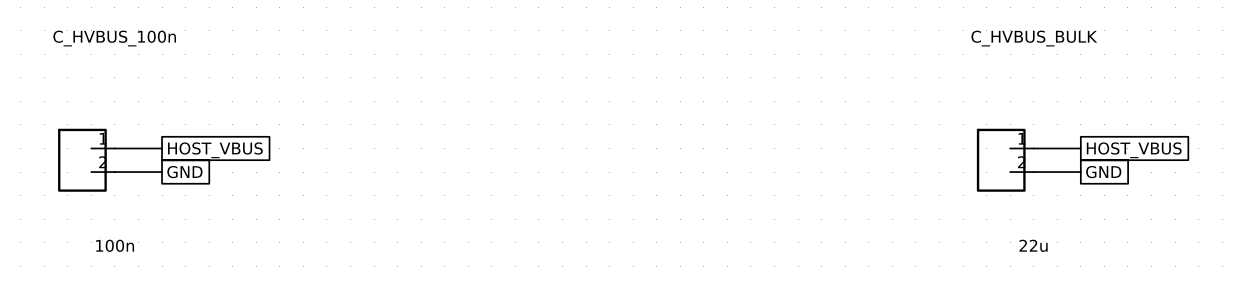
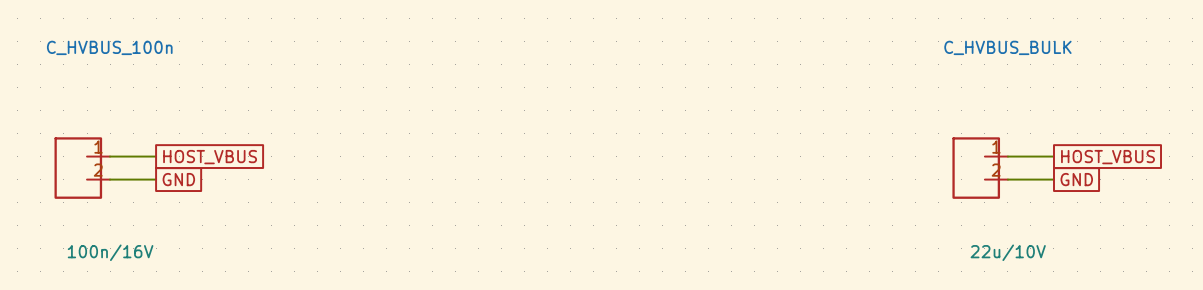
C_HVBUS_100n value: 100n (115, 245) -> 100n/16V (110, 252)
C_HVBUS_BULK value: 22u (1033, 245) -> 22u/10V (1008, 252)

